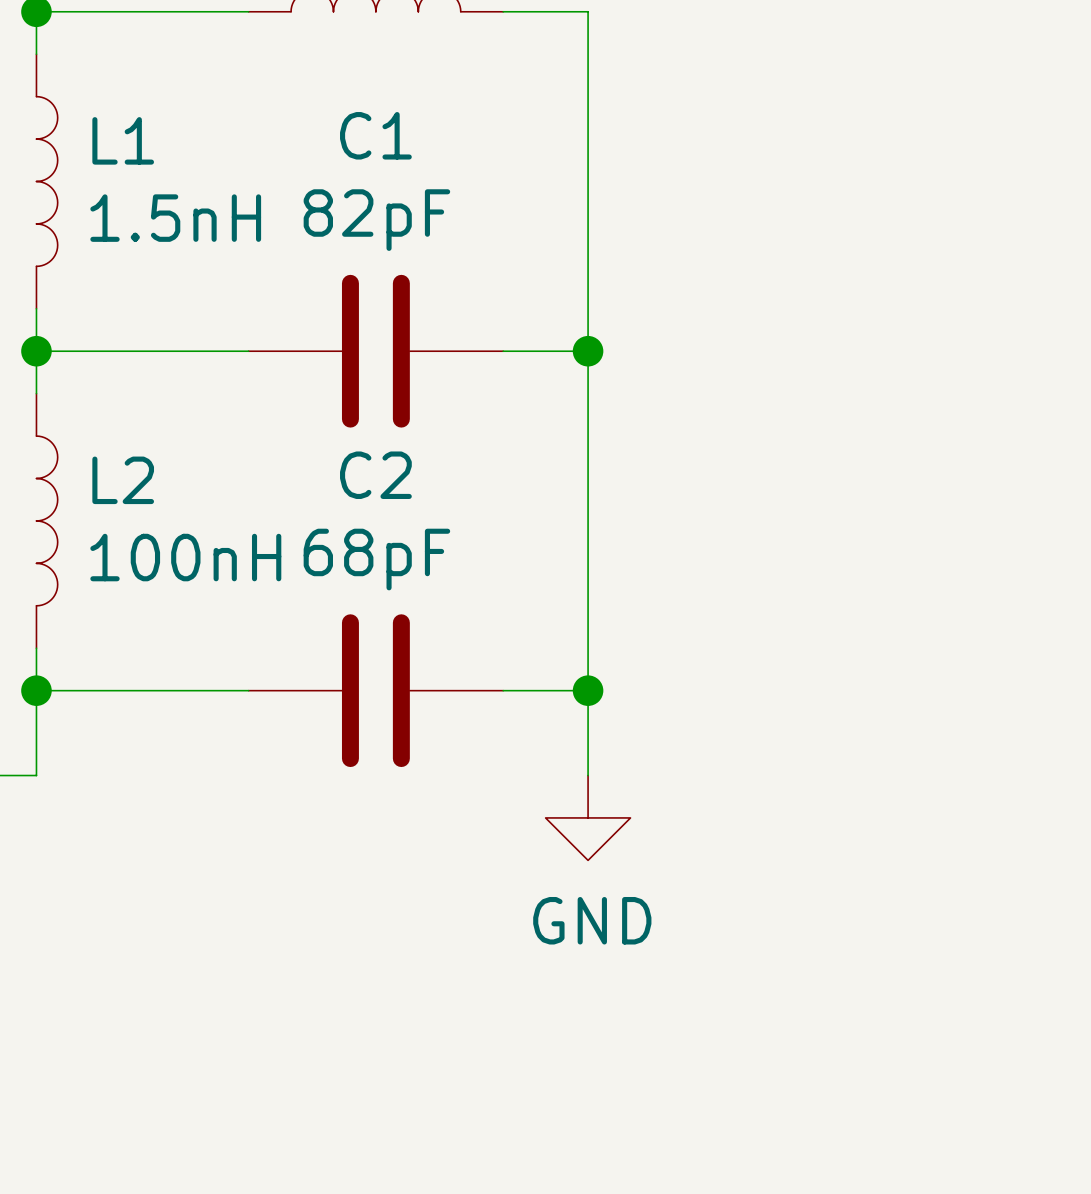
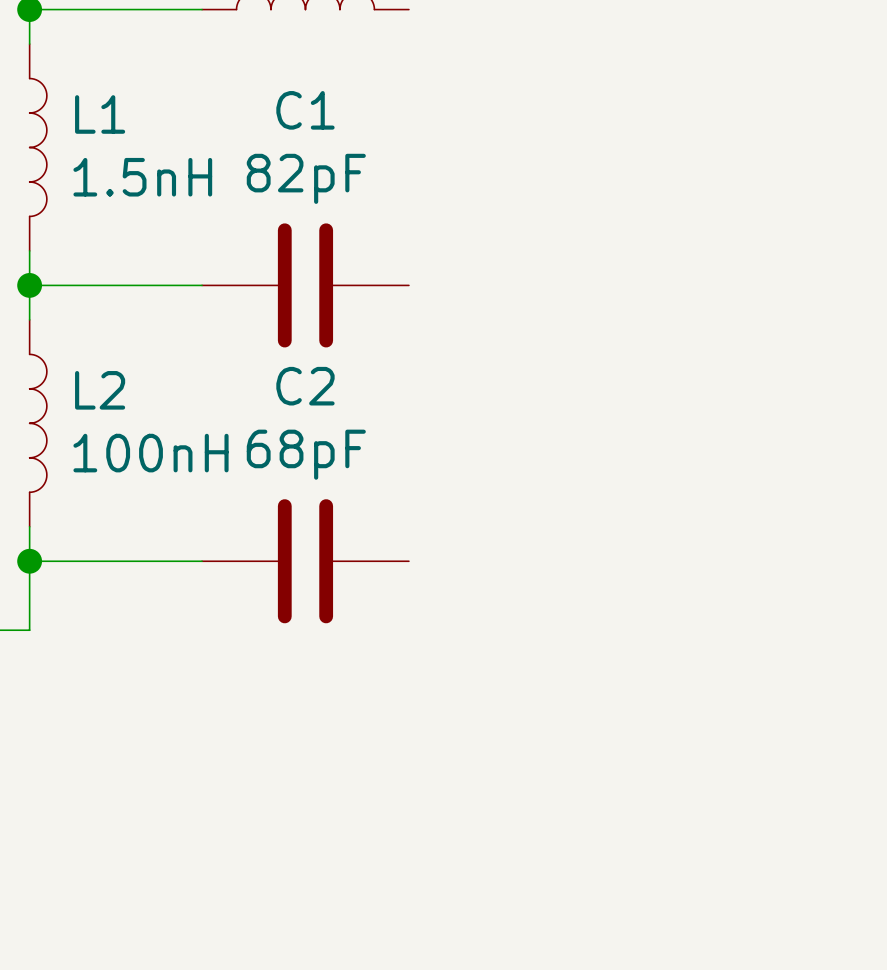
wire: (503, 11) (588, 11) (588, 775) -> none
wire: (503, 351) (588, 351) -> none
junction: (588, 351) -> none
wire: (503, 690) (588, 690) -> none
junction: (588, 690) -> none
power symbol: GND (588, 817) -> none

